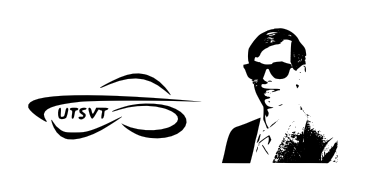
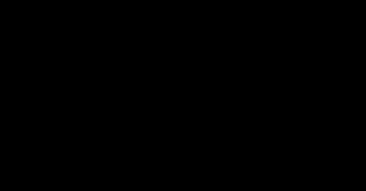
drawing: [221, 28, 338, 164] -> none
drawing: [28, 73, 202, 140] -> none

